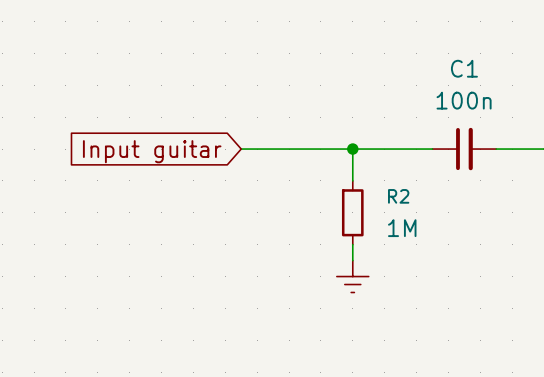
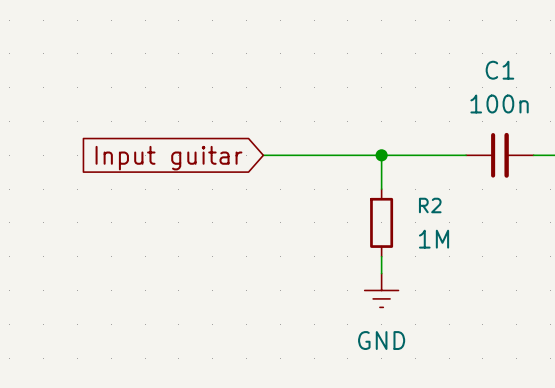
power symbol text: none -> GND (381, 340)

